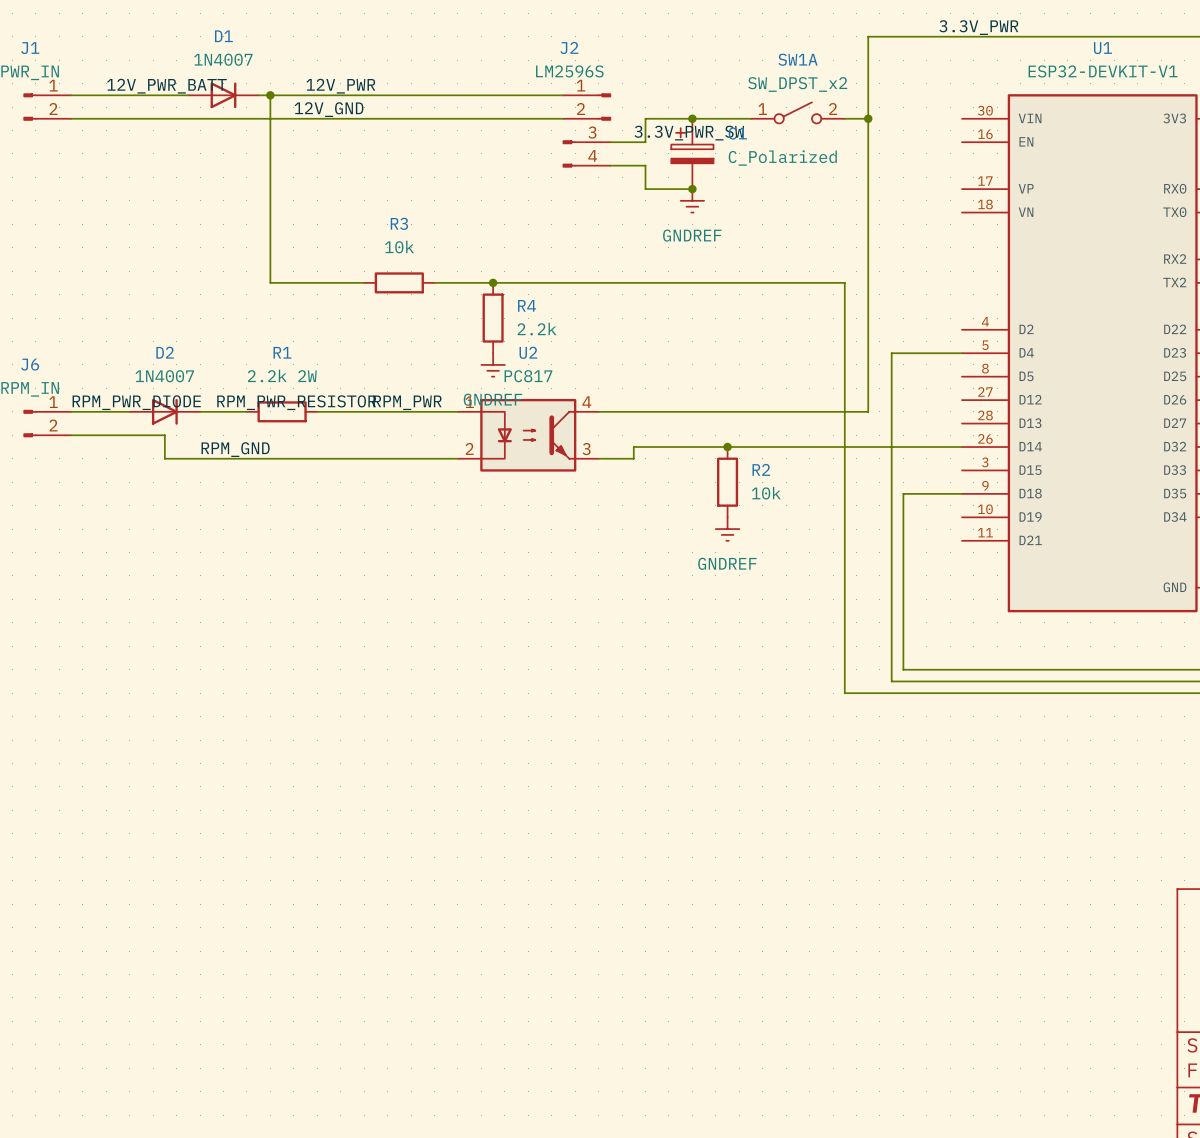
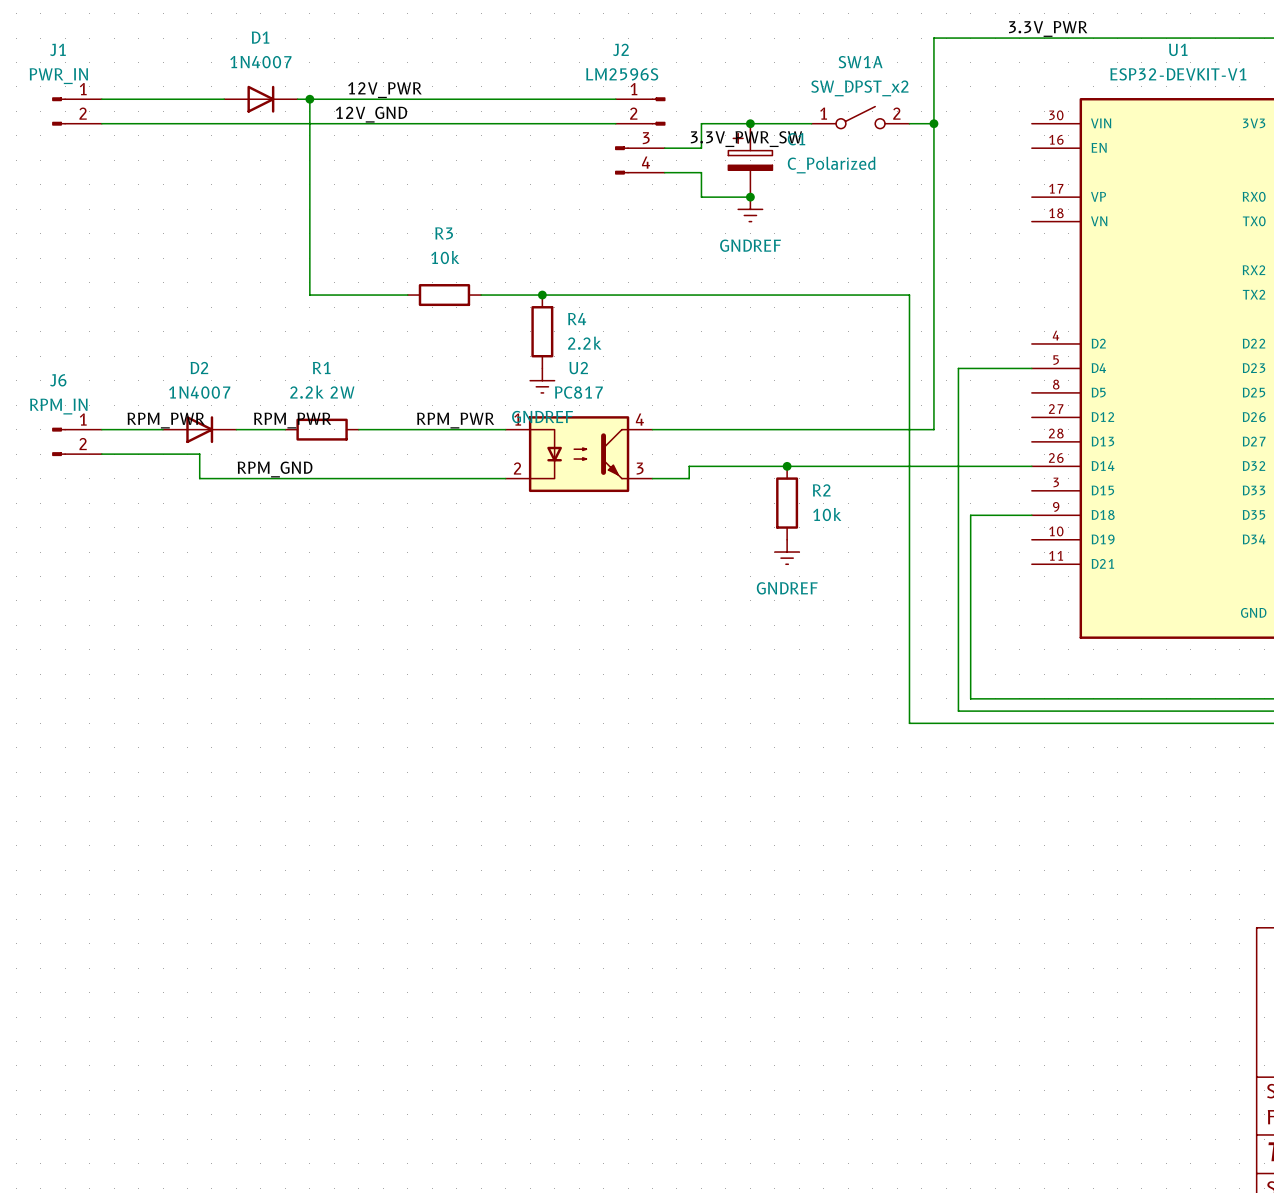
label: 12V_PWR_BATT (166, 86) -> none
label: RPM_PWR_DIODE (136, 402) -> RPM_PWR (166, 420)
label: RPM_PWR_RESISTOR (296, 402) -> RPM_PWR (292, 420)

